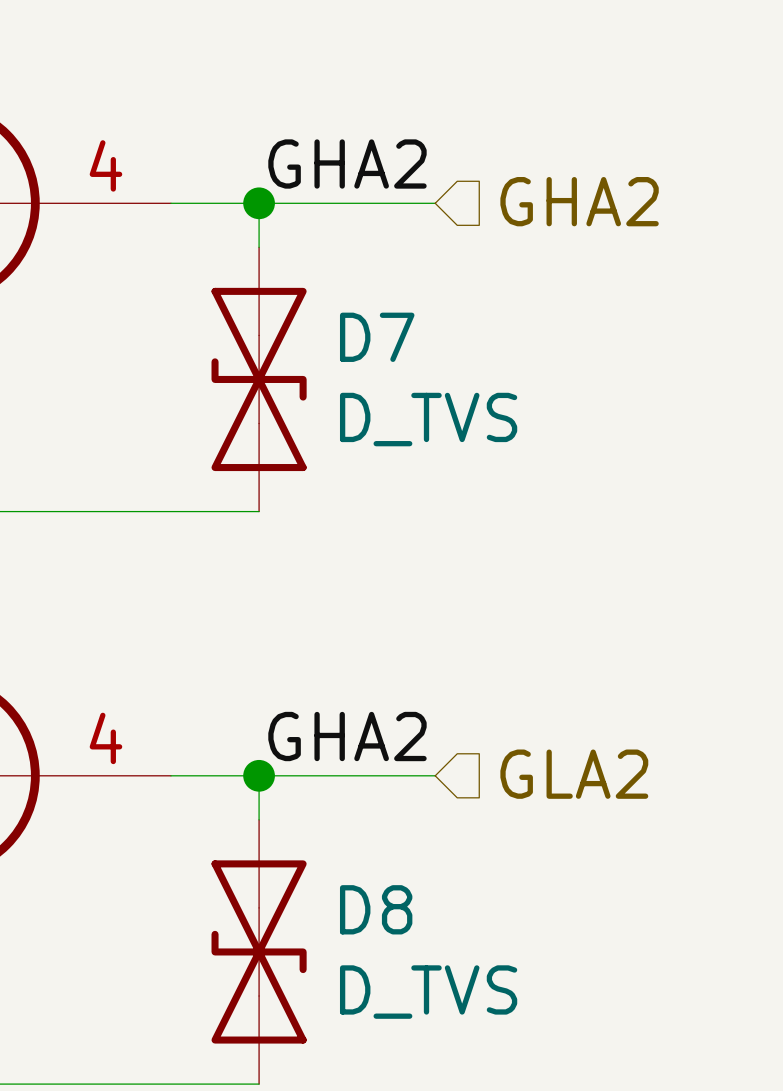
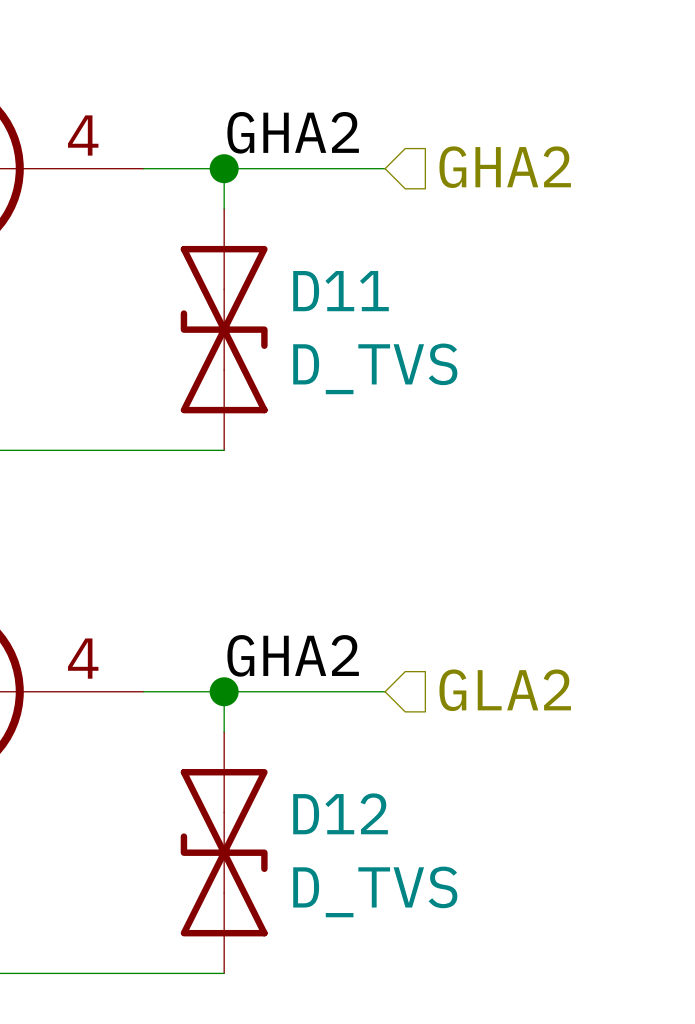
D7 name: D7 (377, 337) -> D11 (341, 291)
D8 name: D8 (376, 909) -> D12 (340, 813)

